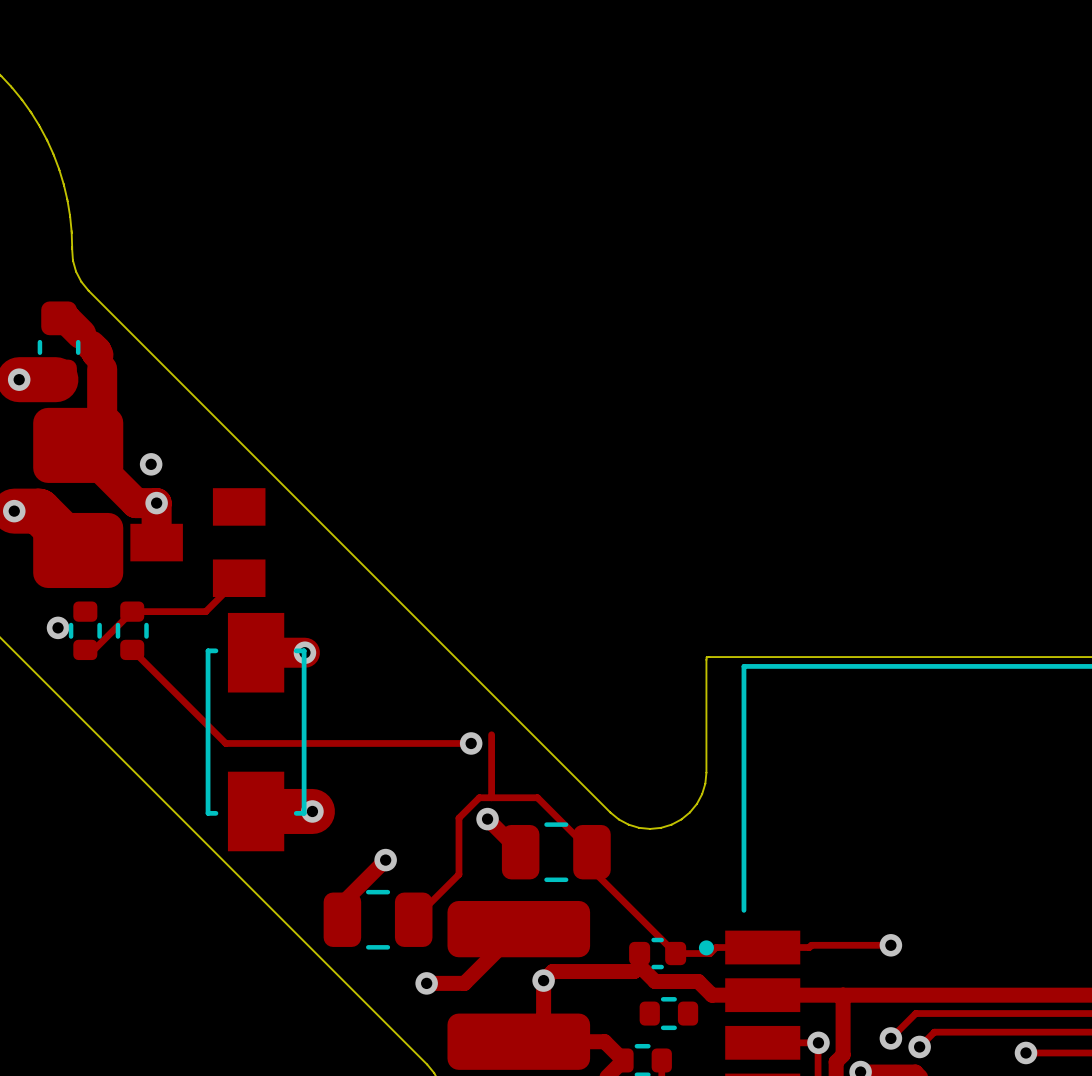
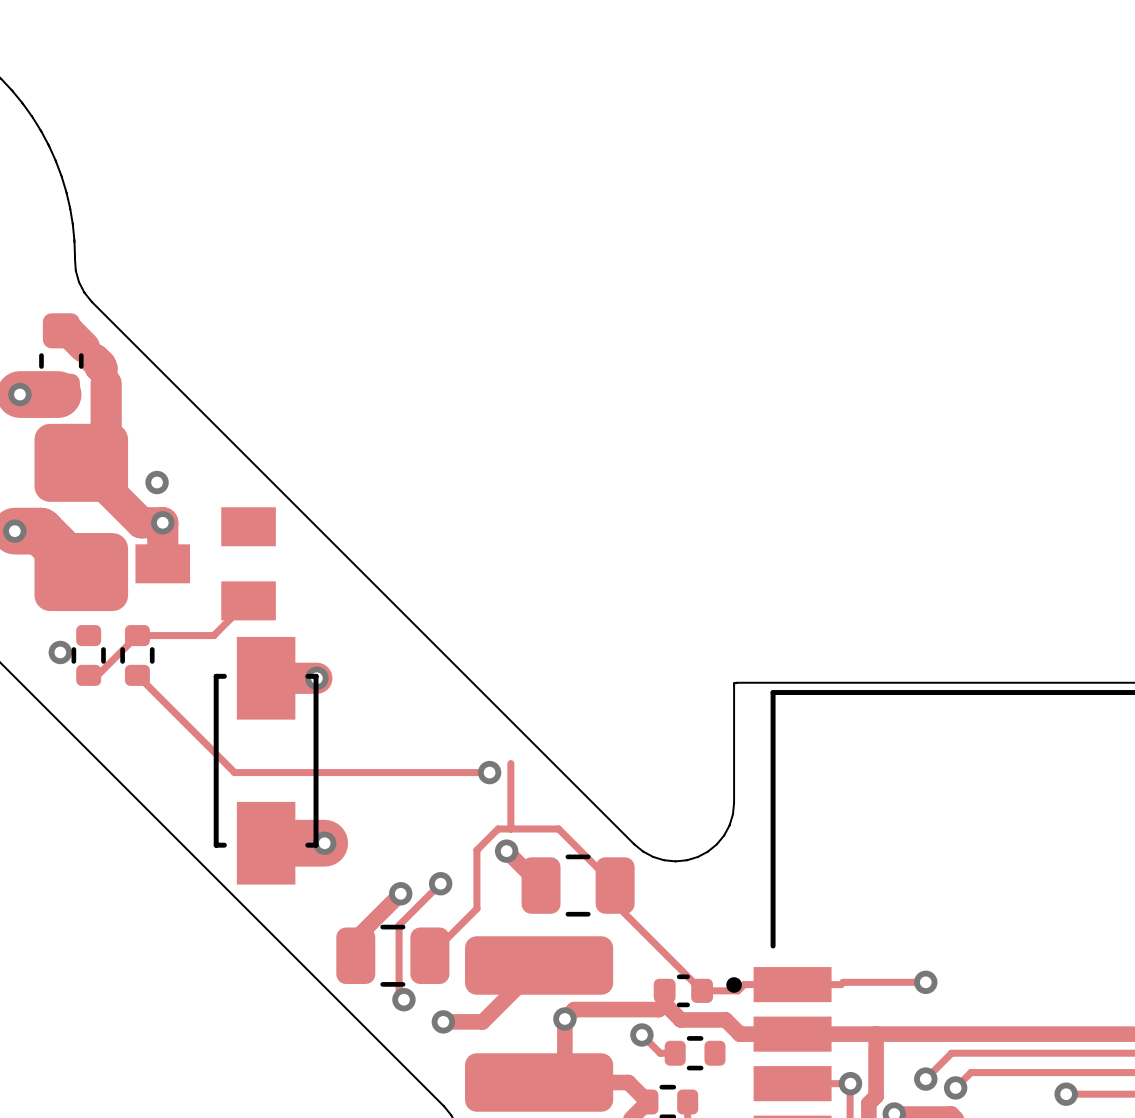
track: none -> (440, 883) (399, 925) (399, 994) (403, 999)
via: none -> (440, 883)
via: none -> (403, 999)
track: none -> (641, 1034) (660, 1053) (675, 1053)
via: none -> (641, 1034)

